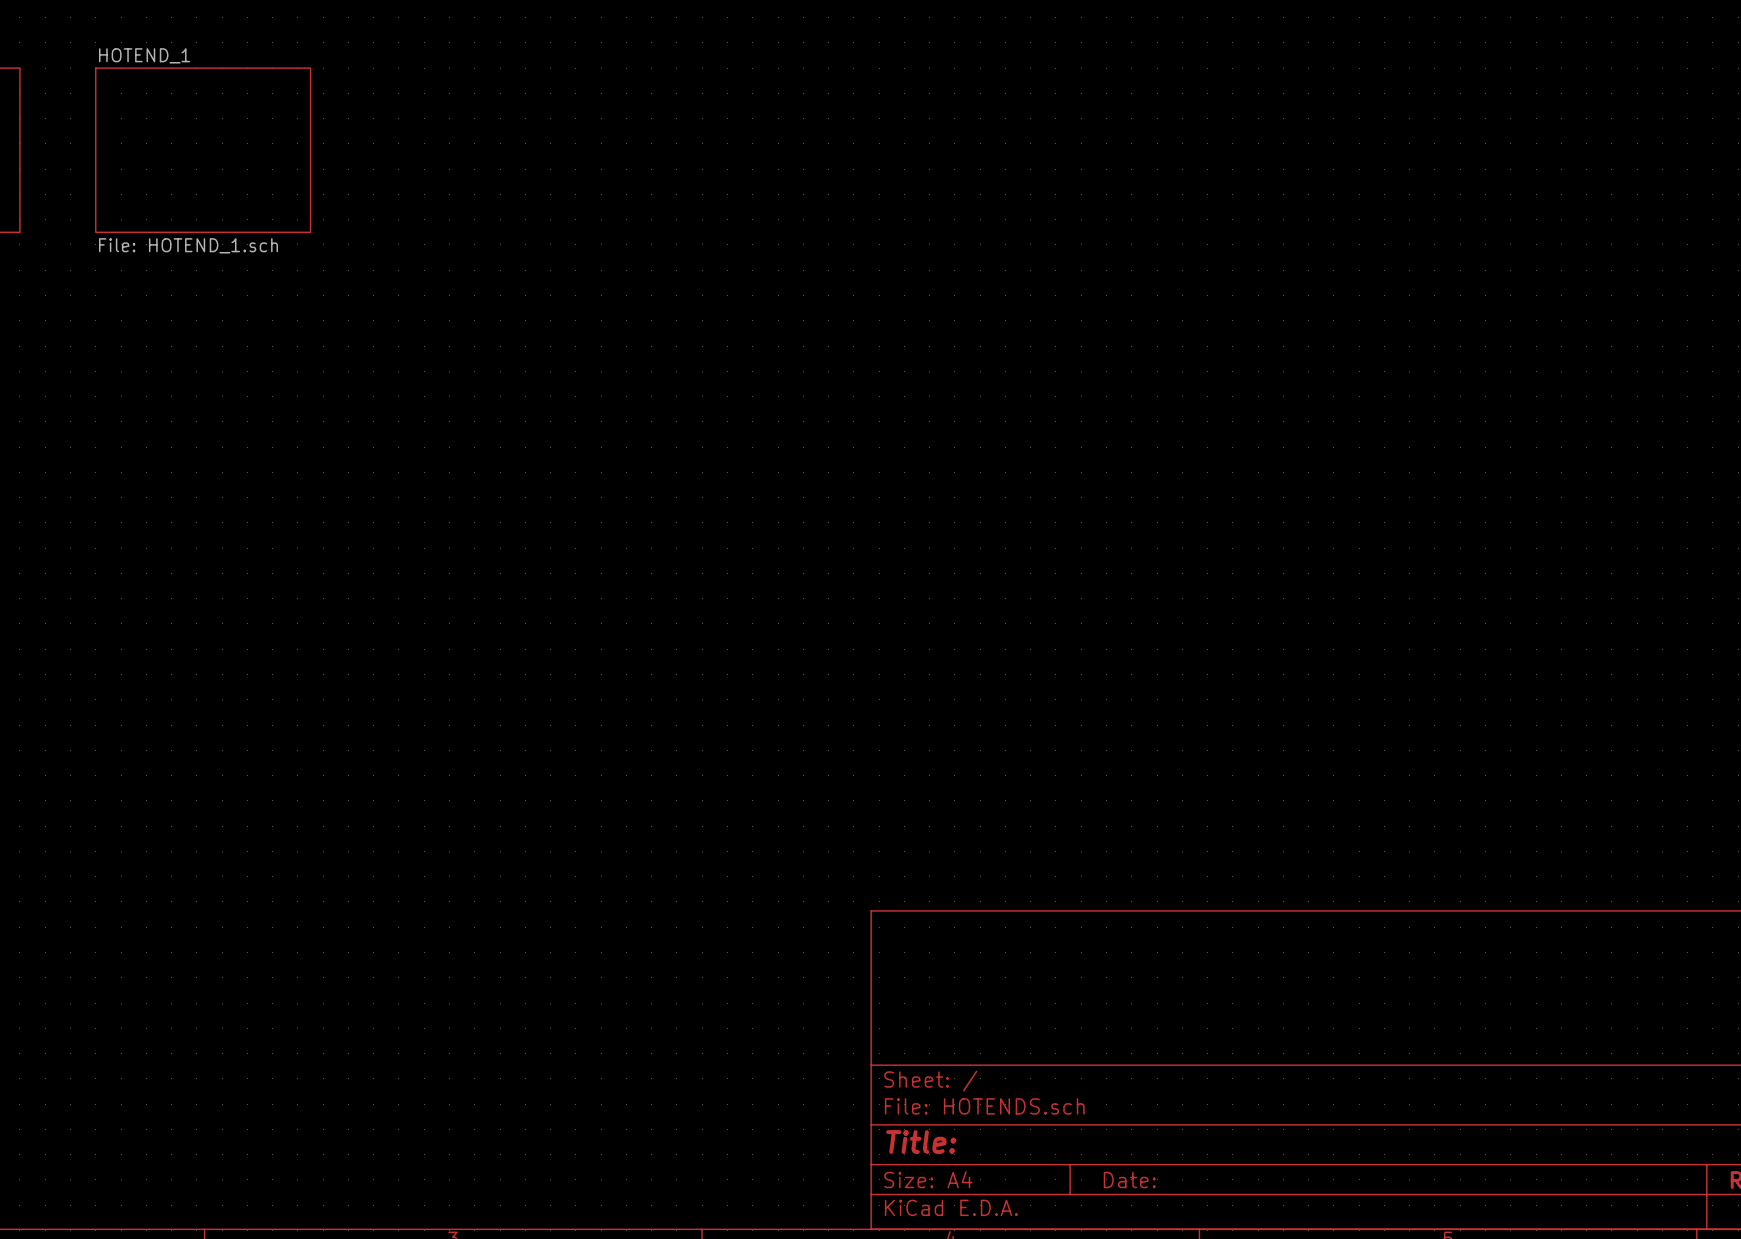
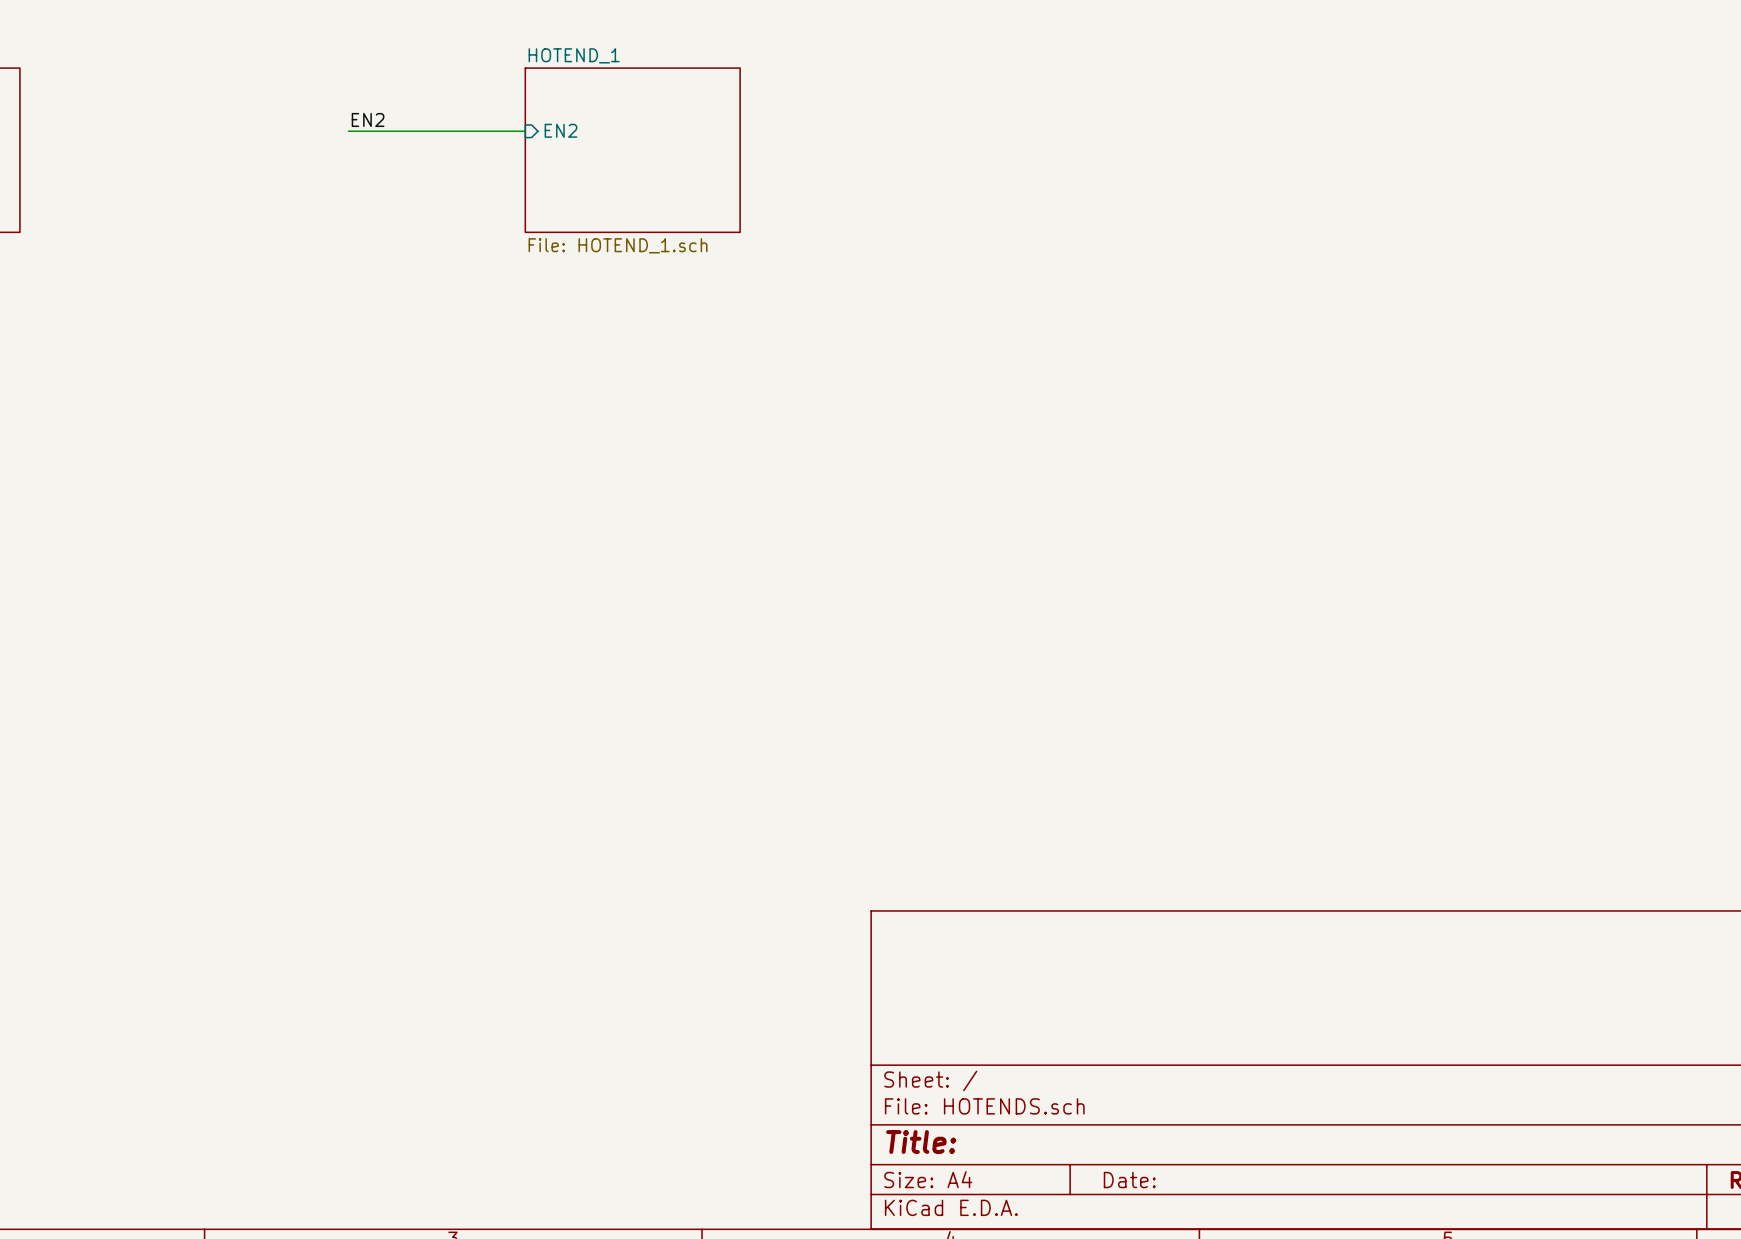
label: none -> EN2 (368, 119)
sheet pin: none -> EN2 (561, 130)
wire: none -> (348, 131) (525, 131)
sheet HOTEND_1 position: (203, 150) -> (632, 150)

